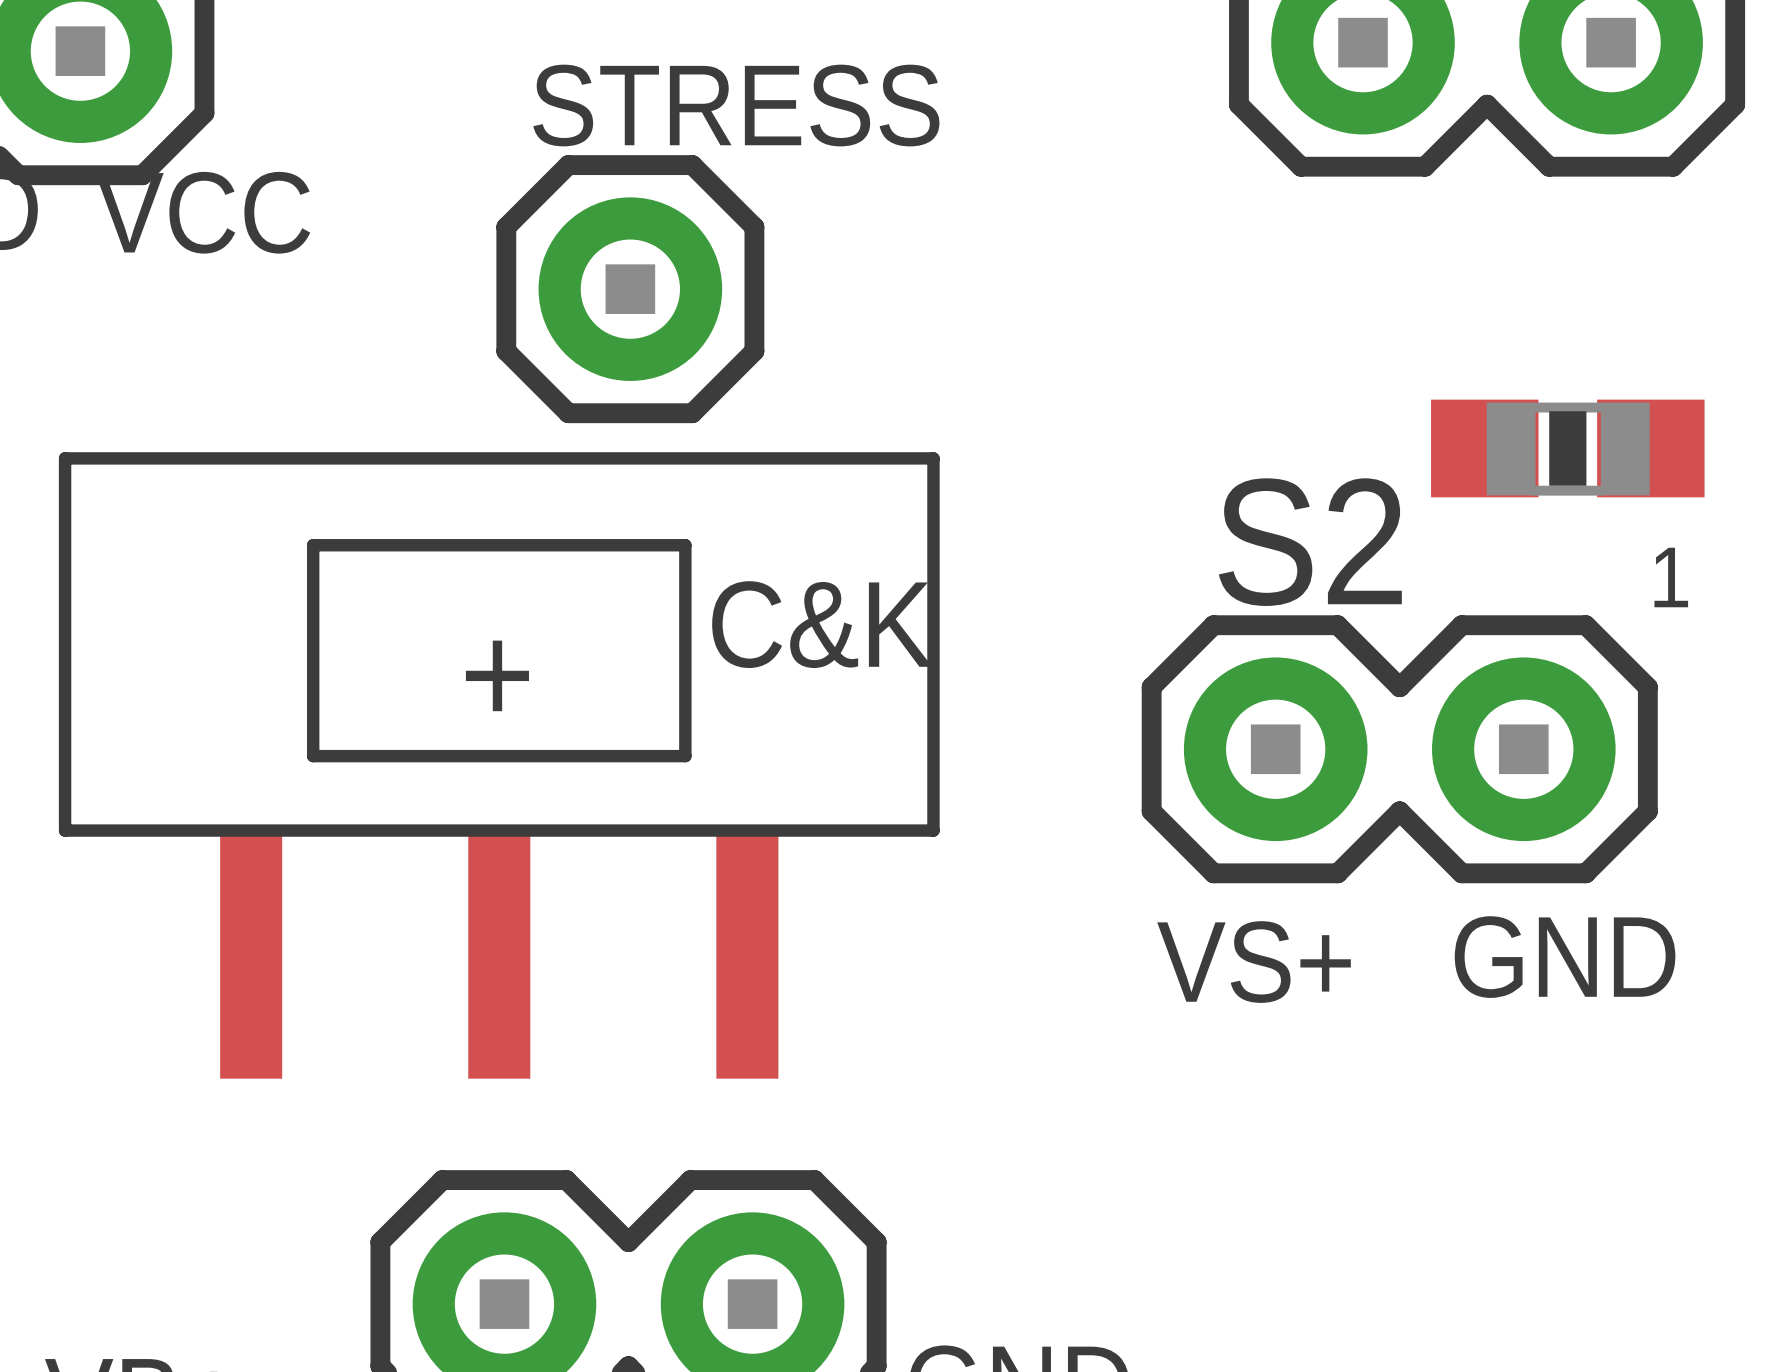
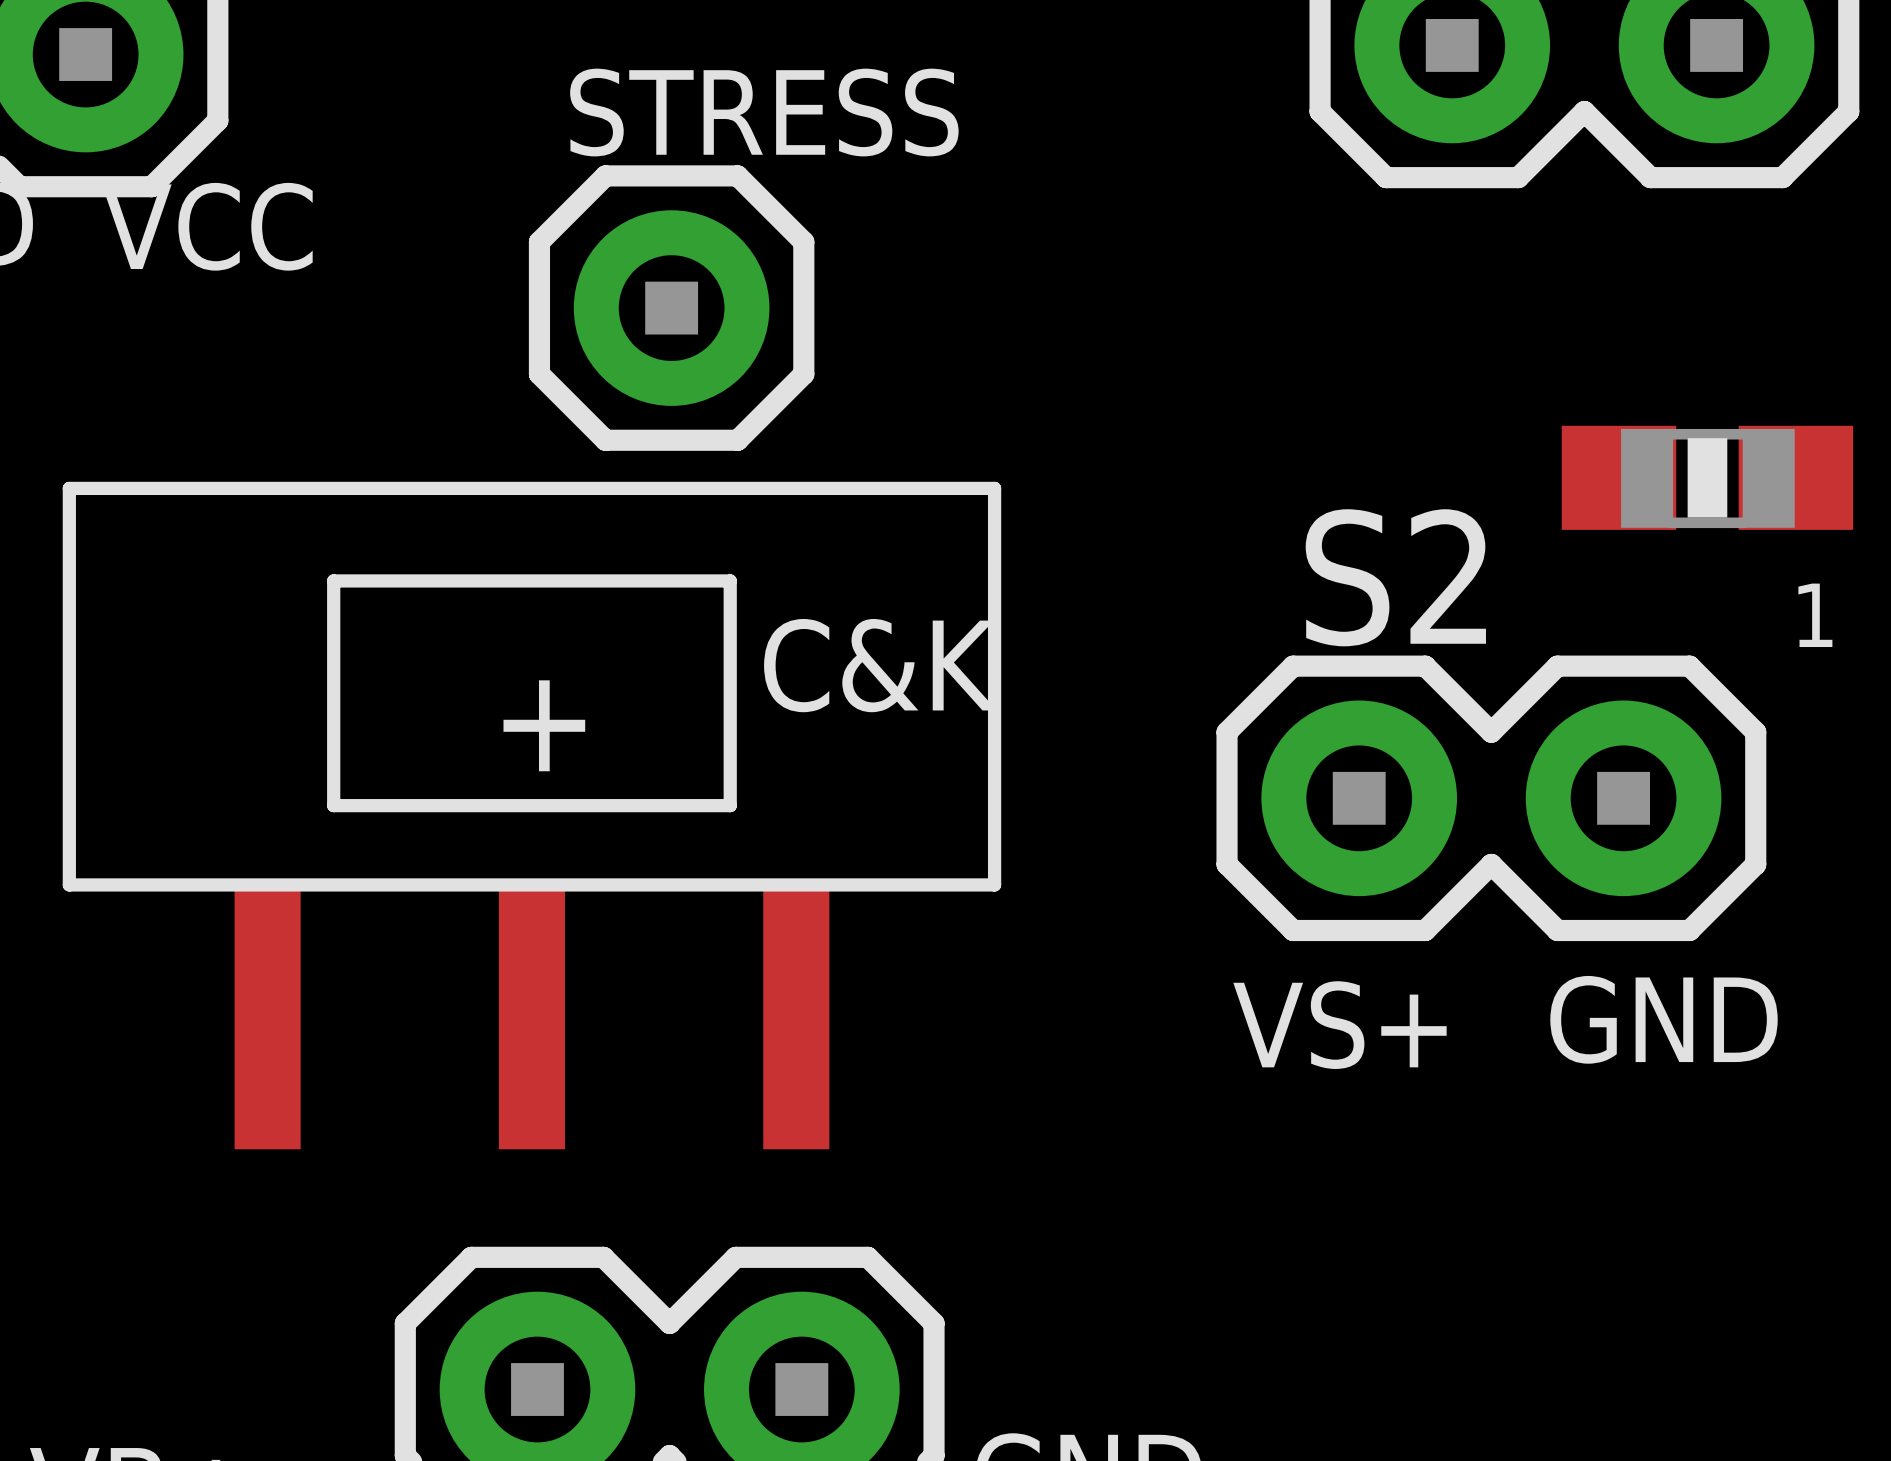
part position: (1567, 448) -> (1707, 477)

